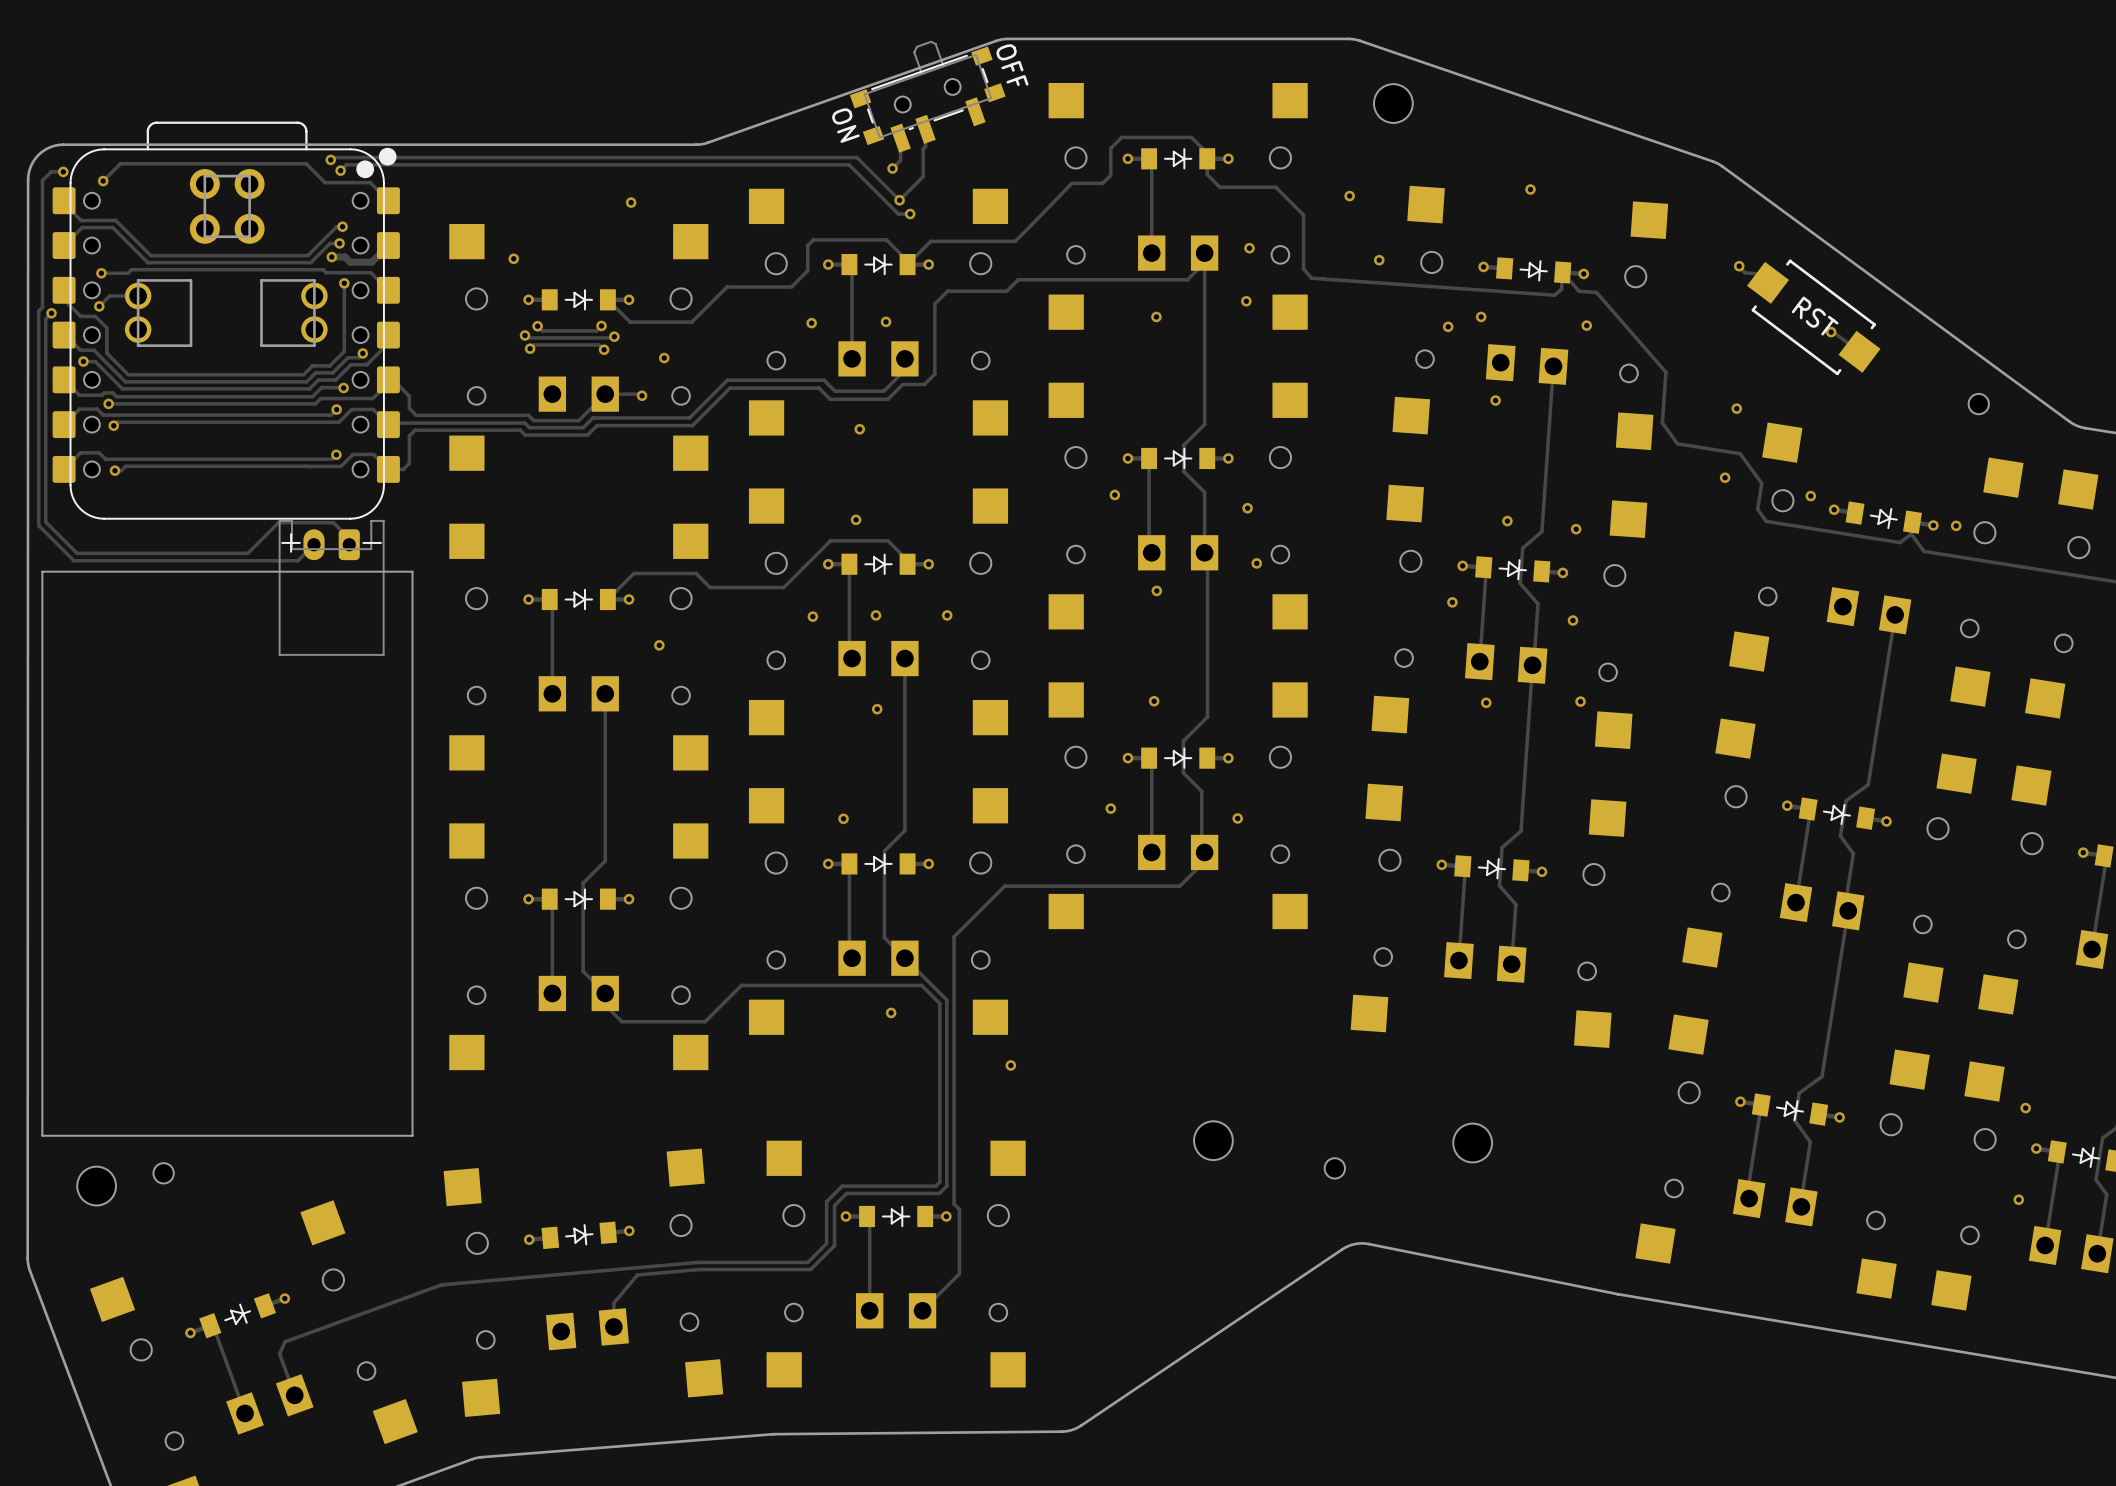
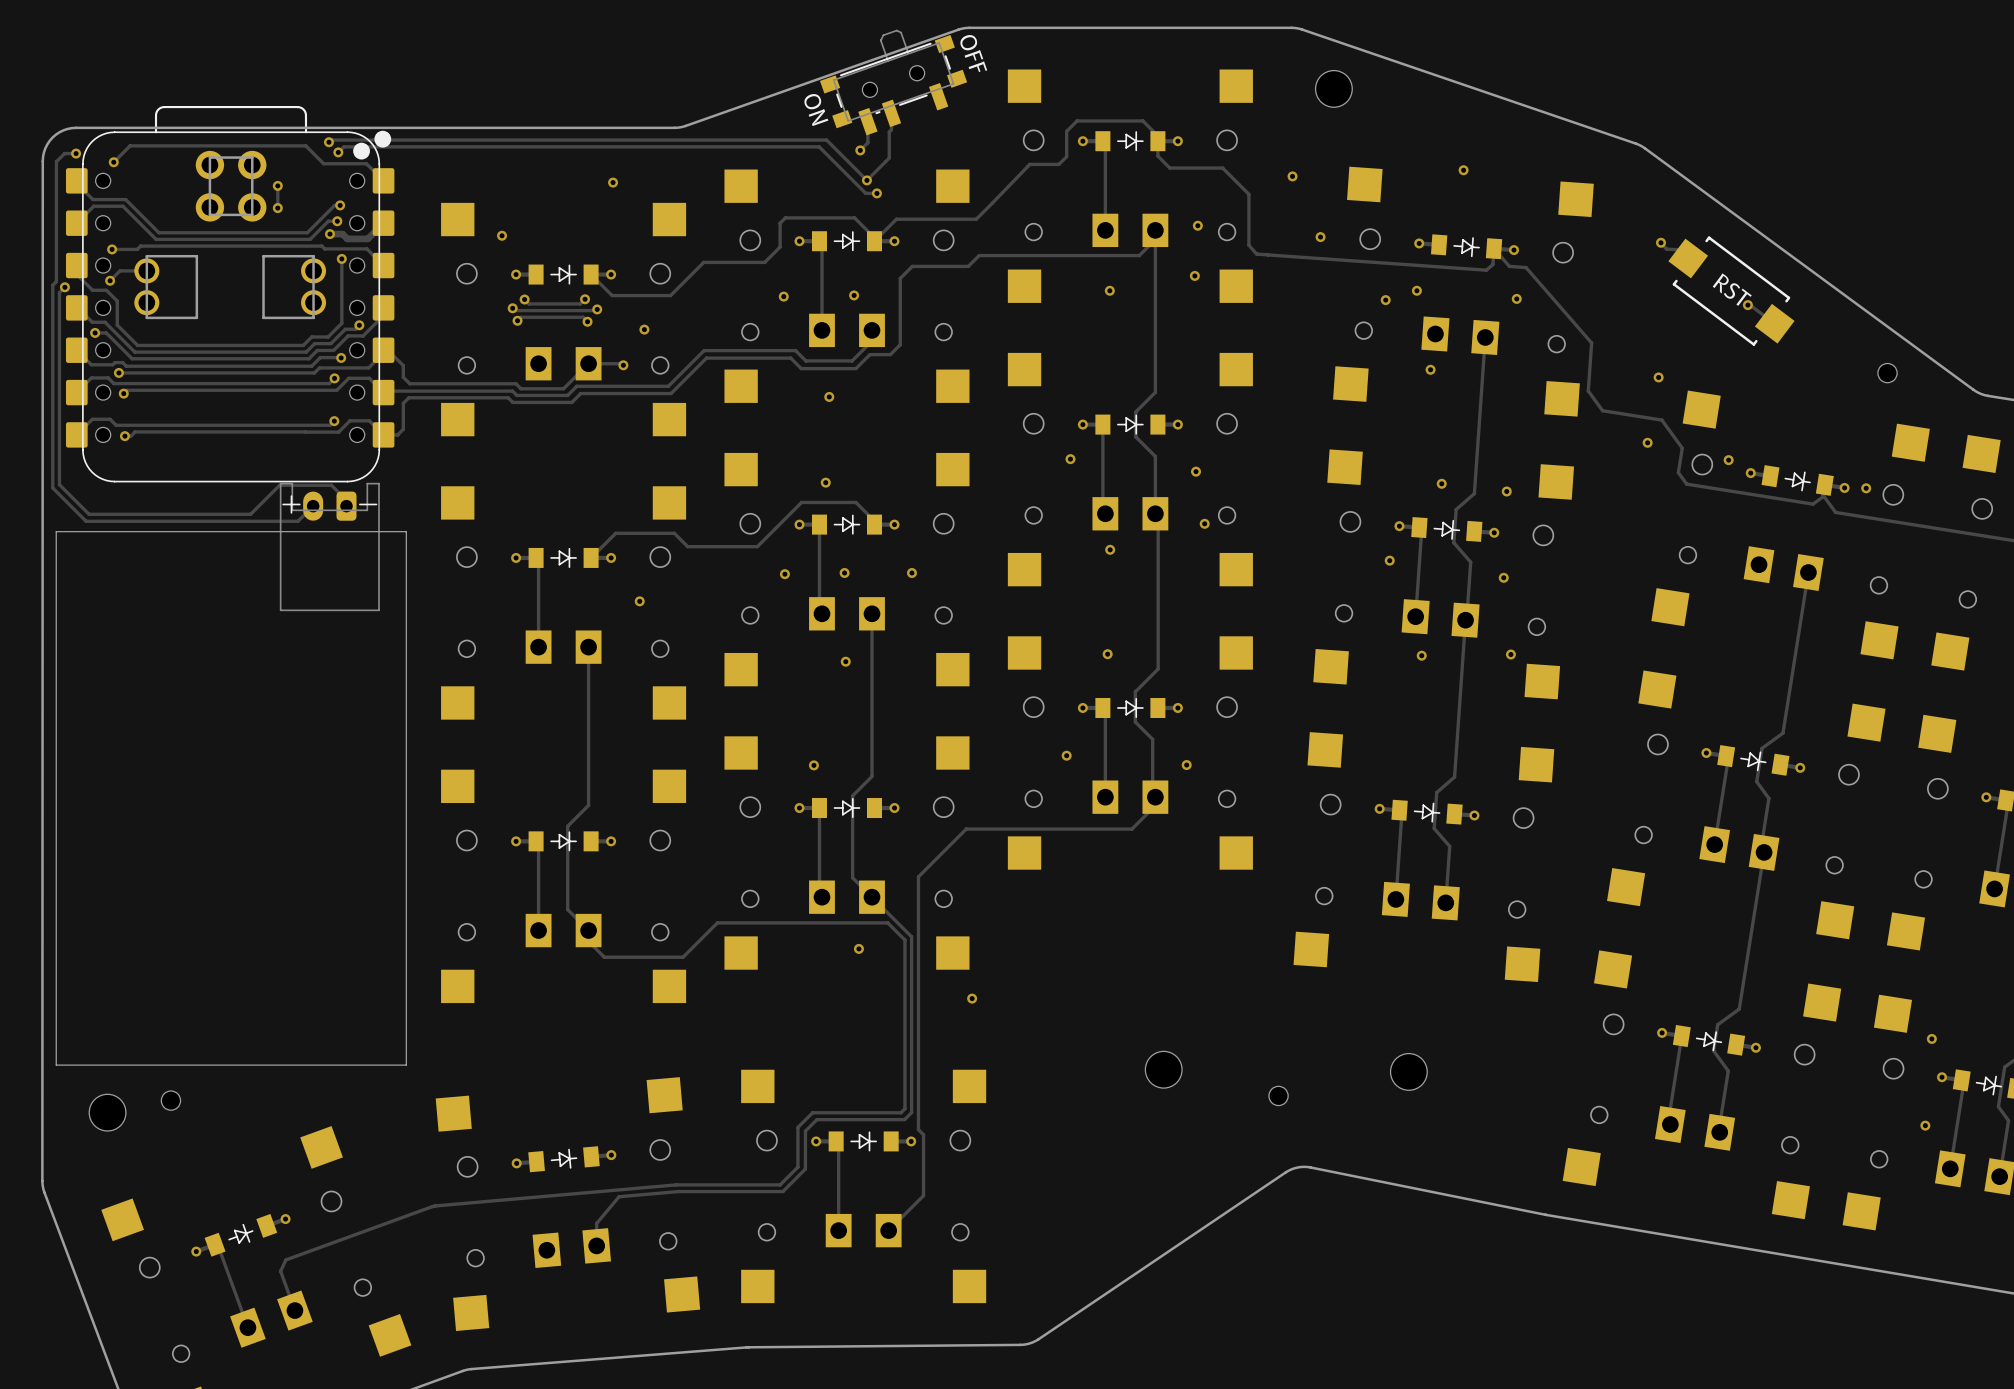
track: none -> (277, 185) (277, 208)
via: none -> (277, 185)
via: none -> (277, 208)

